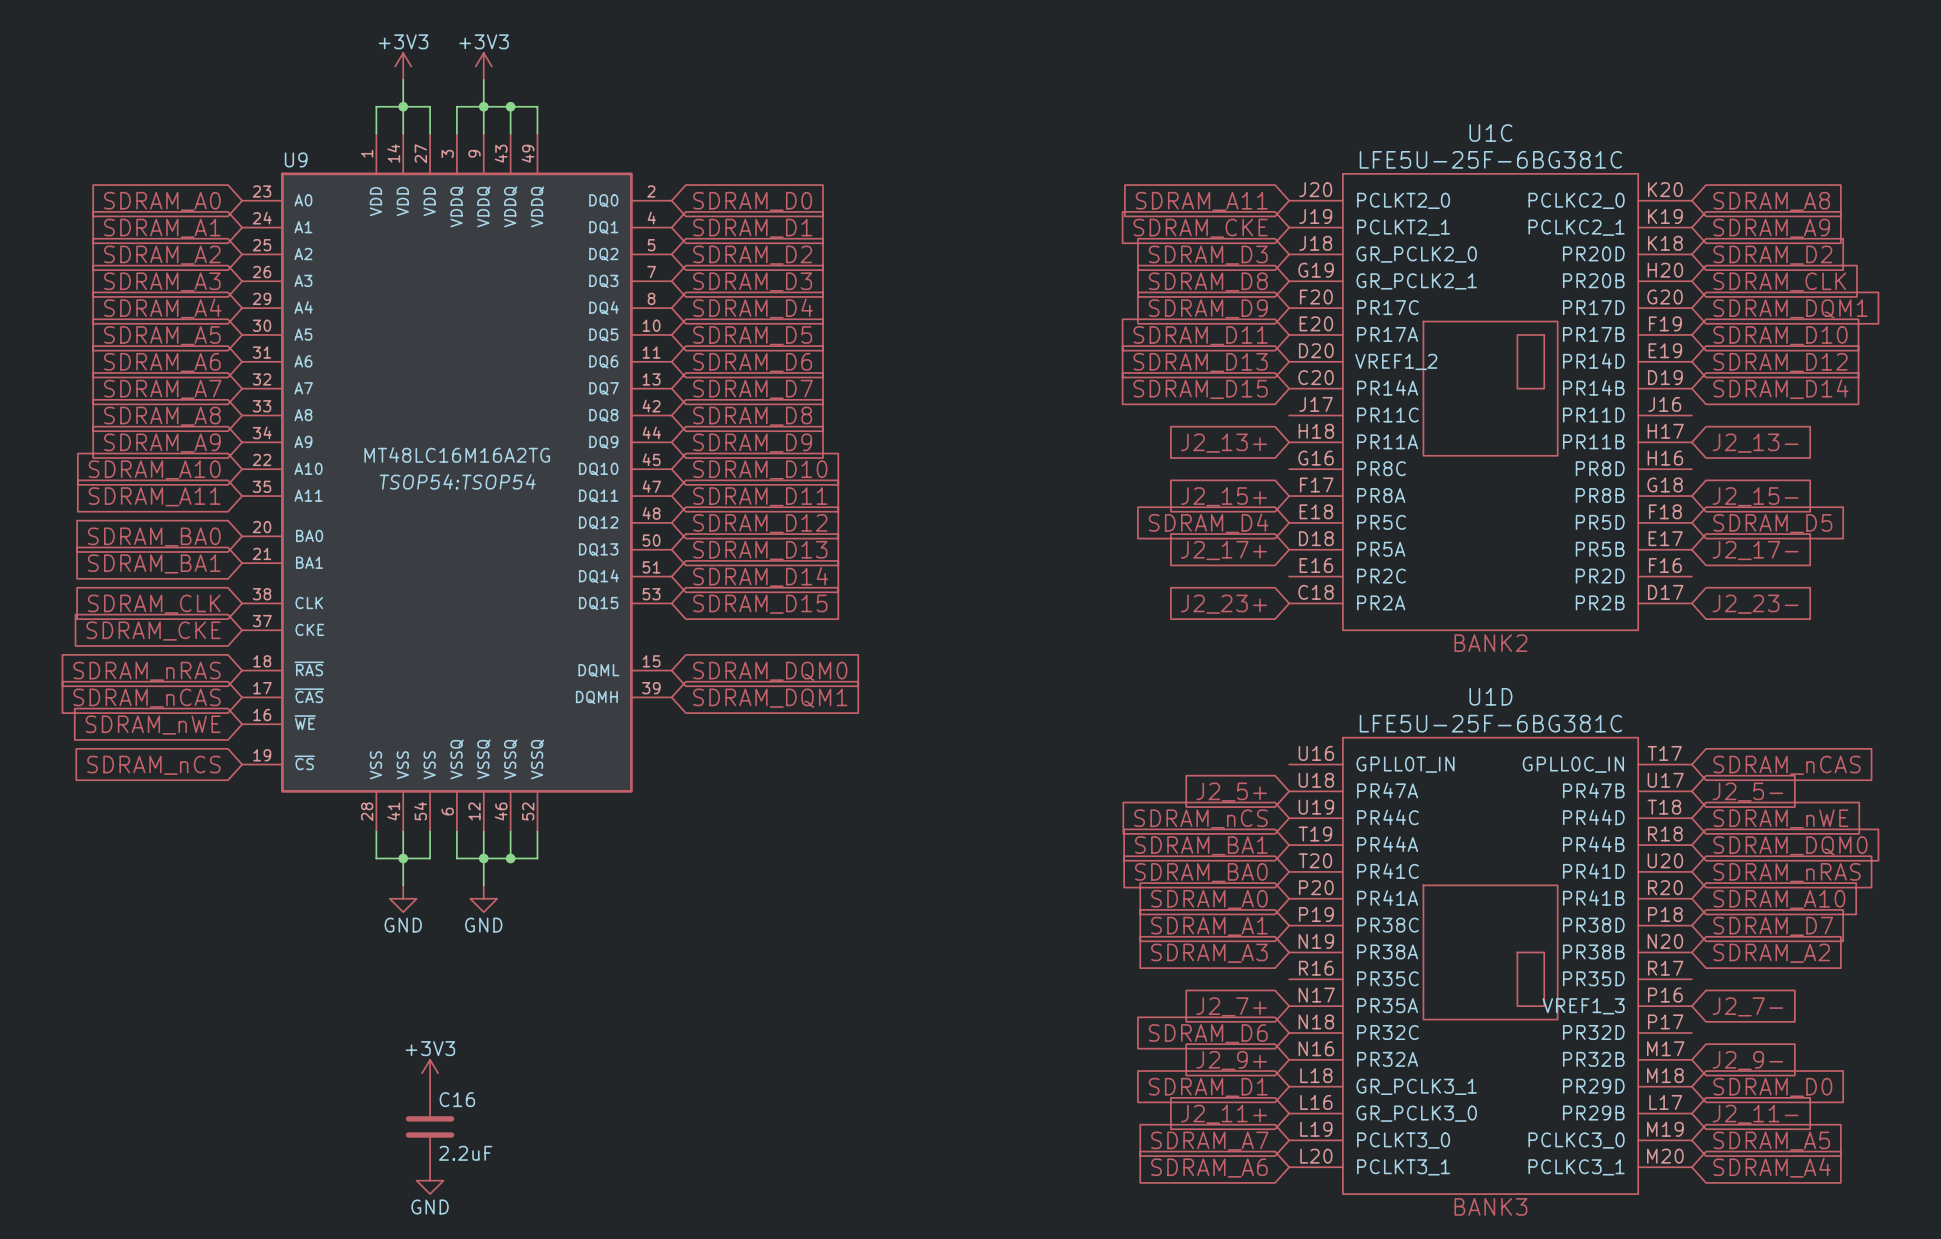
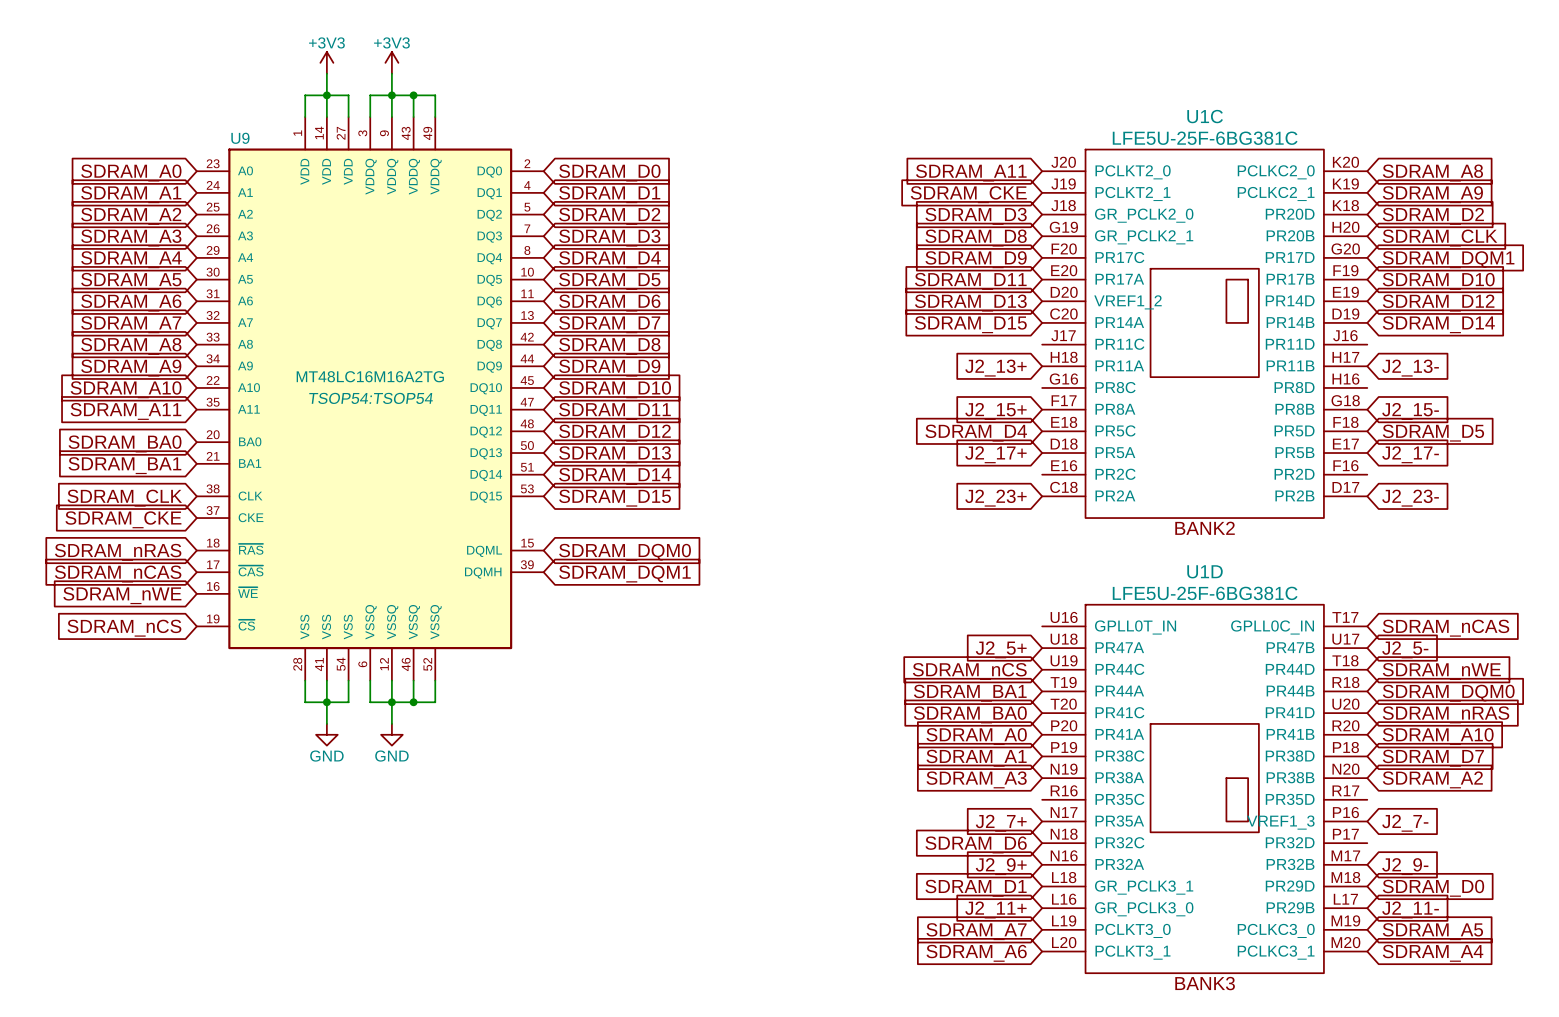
power symbol: +3V3 (430, 1073) -> none
C16: 2.2uF (430, 1126) -> none
power symbol: GND (430, 1180) -> none

